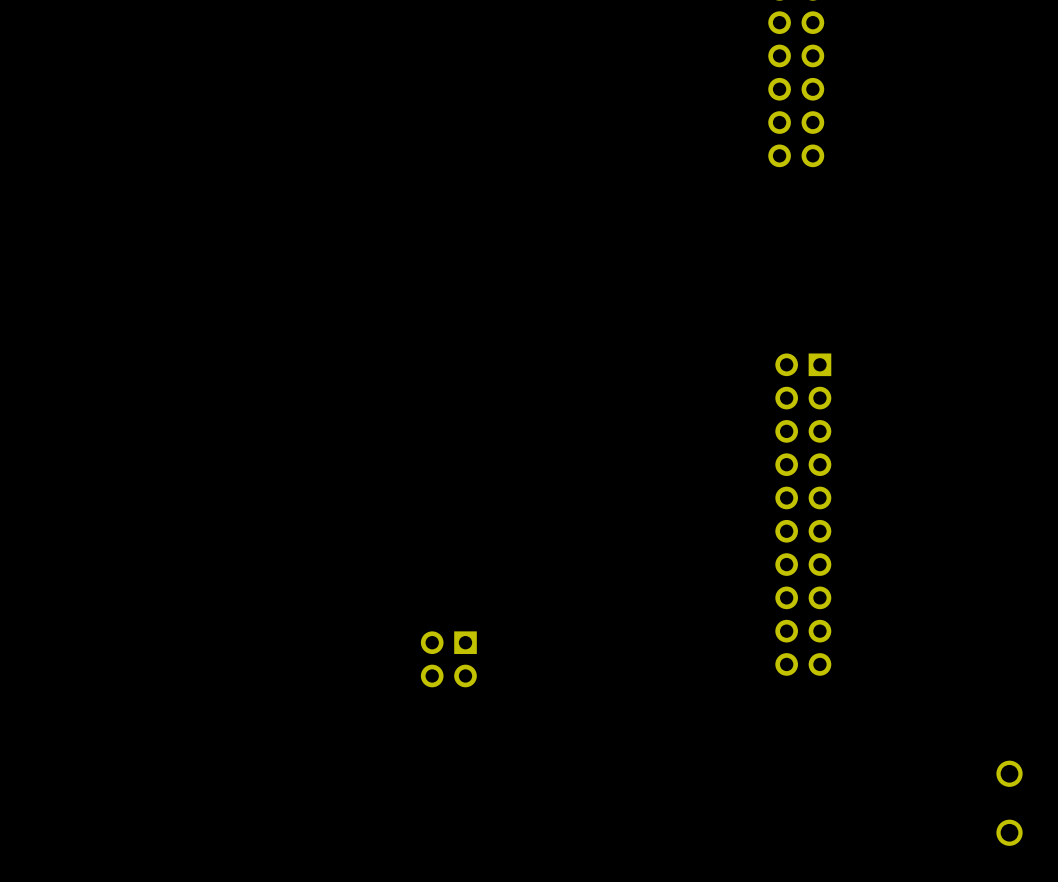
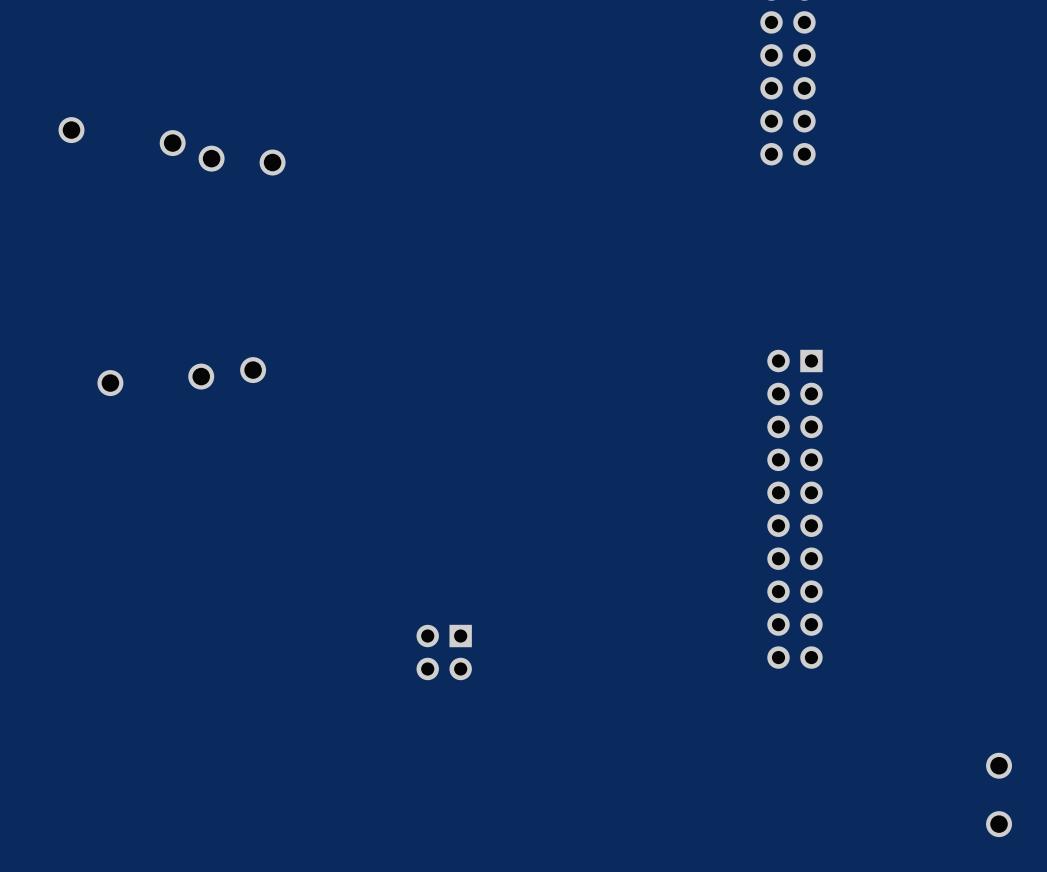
part: none -> (71, 130)
part: none -> (172, 143)
part: none -> (211, 158)
part: none -> (272, 162)
part: none -> (253, 370)
part: none -> (201, 376)
part: none -> (110, 383)

